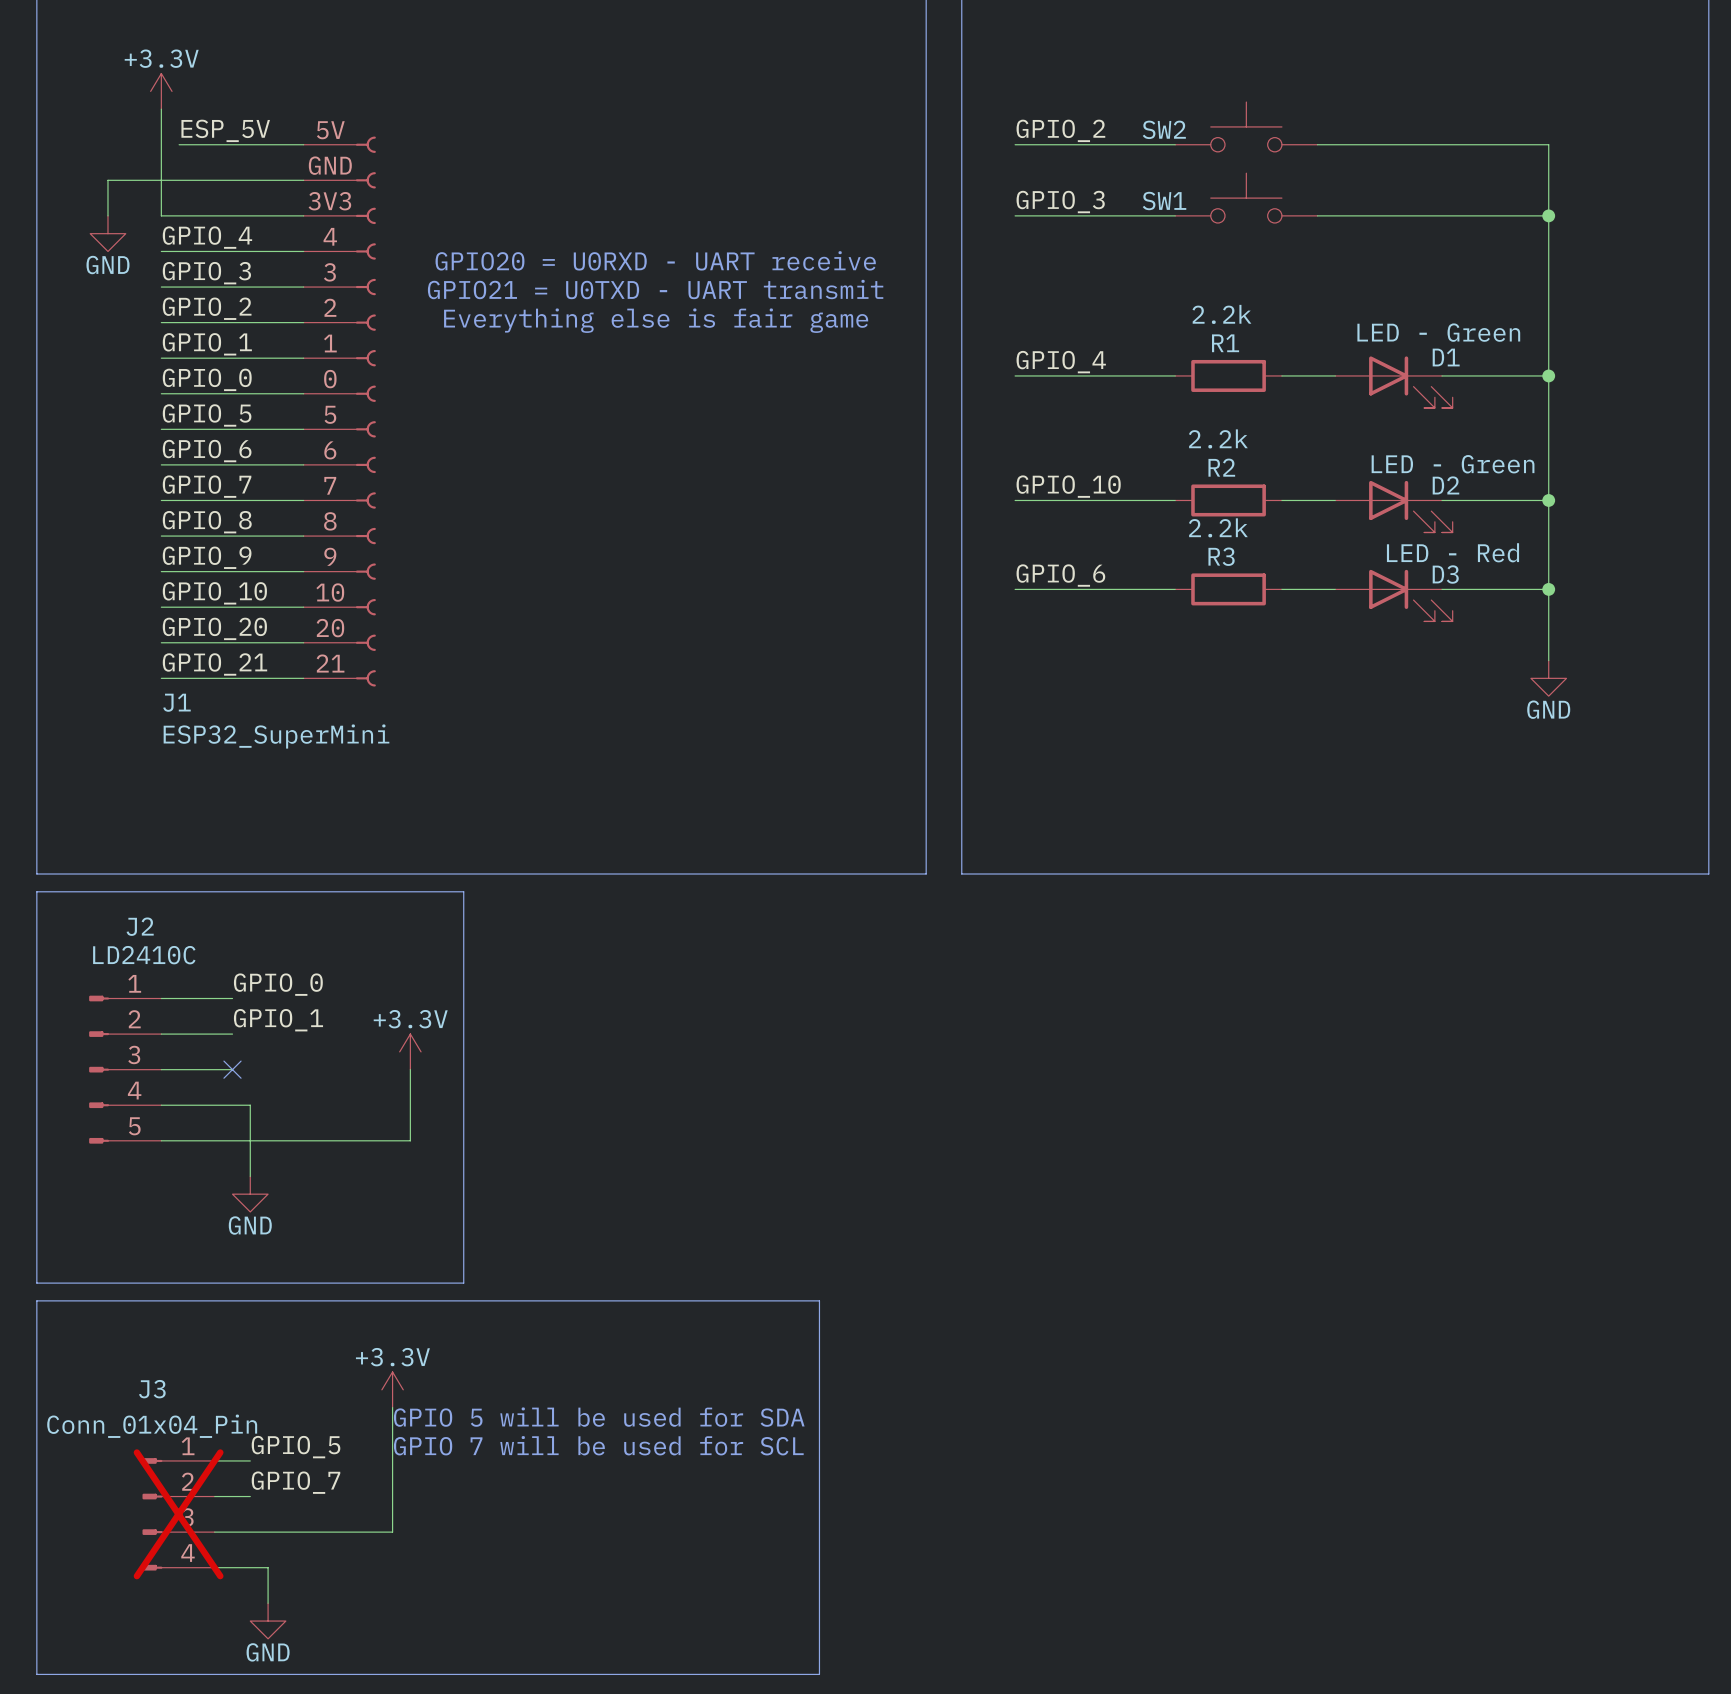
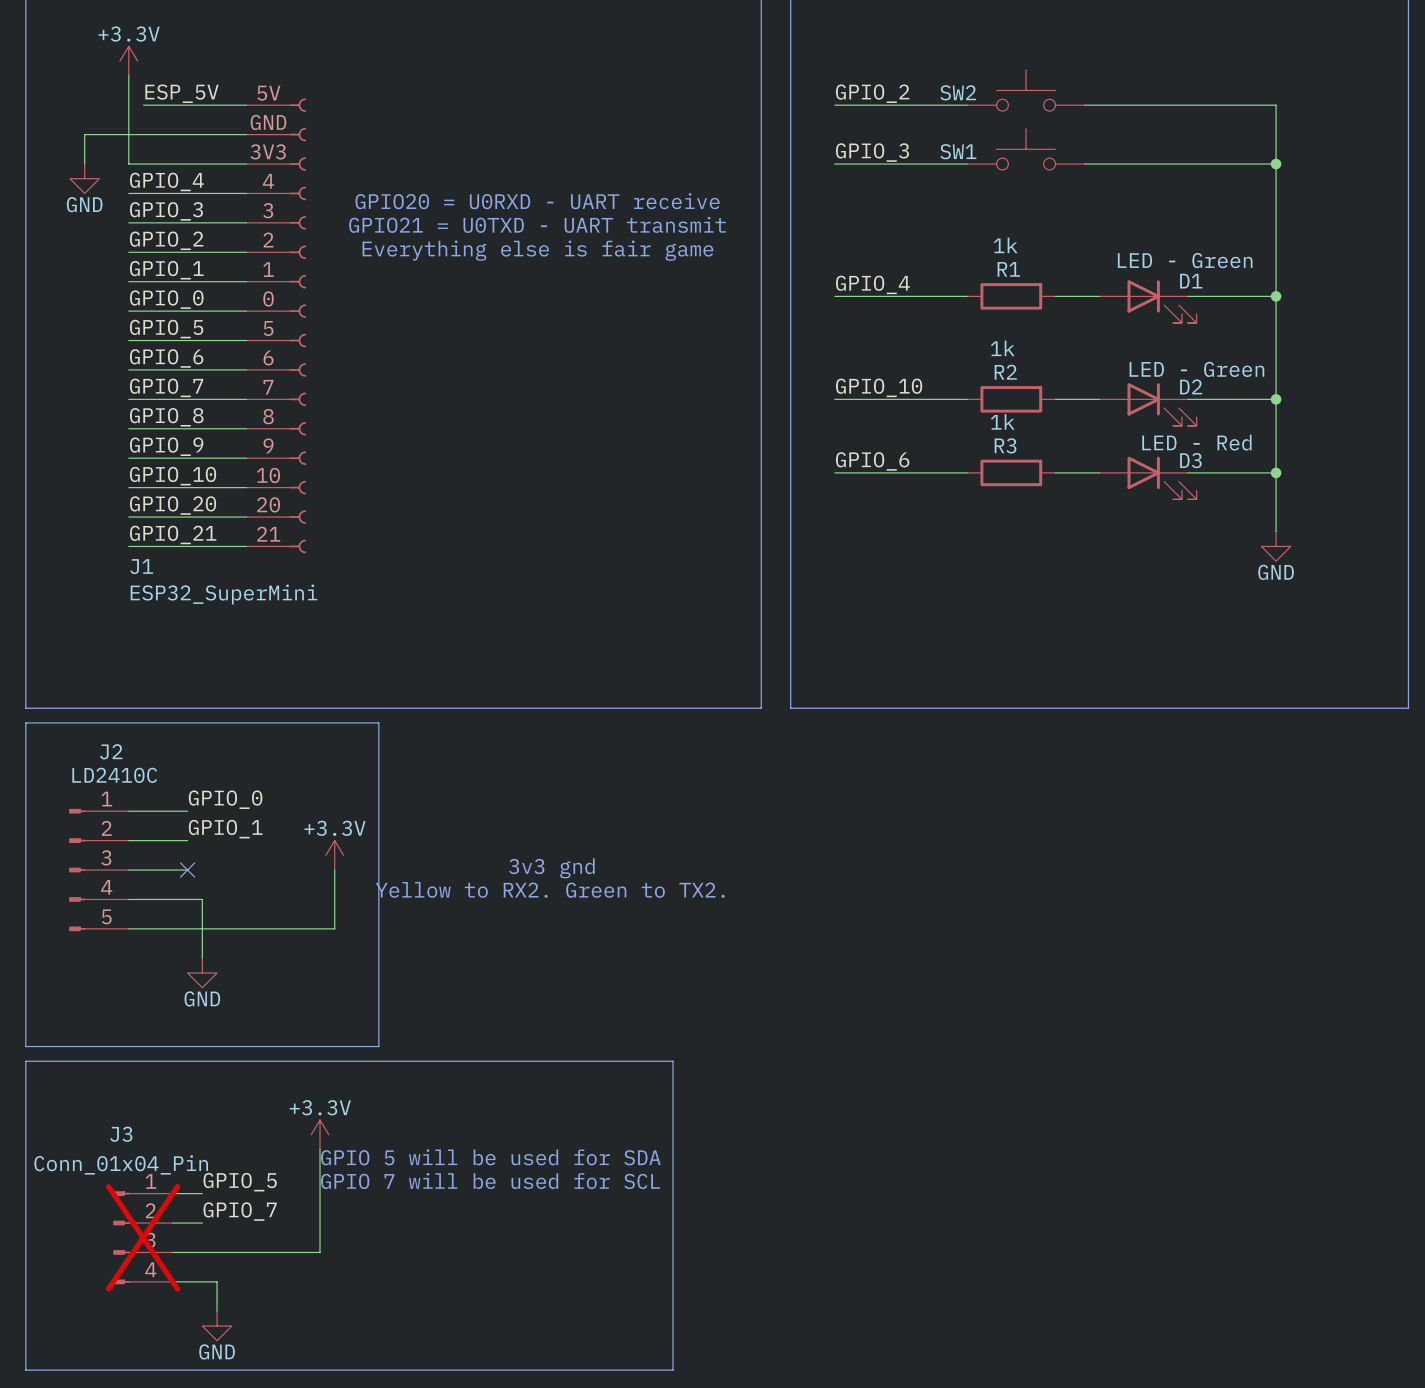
R1 value: 2.2k (1221, 314) -> 1k (1005, 245)
R2 value: 2.2k (1218, 438) -> 1k (1002, 348)
R3 value: 2.2k (1218, 527) -> 1k (1002, 421)
text: none -> 3v3 gnd (551, 868)
text: none -> Yellow to RX2. Green to TX2. (550, 889)

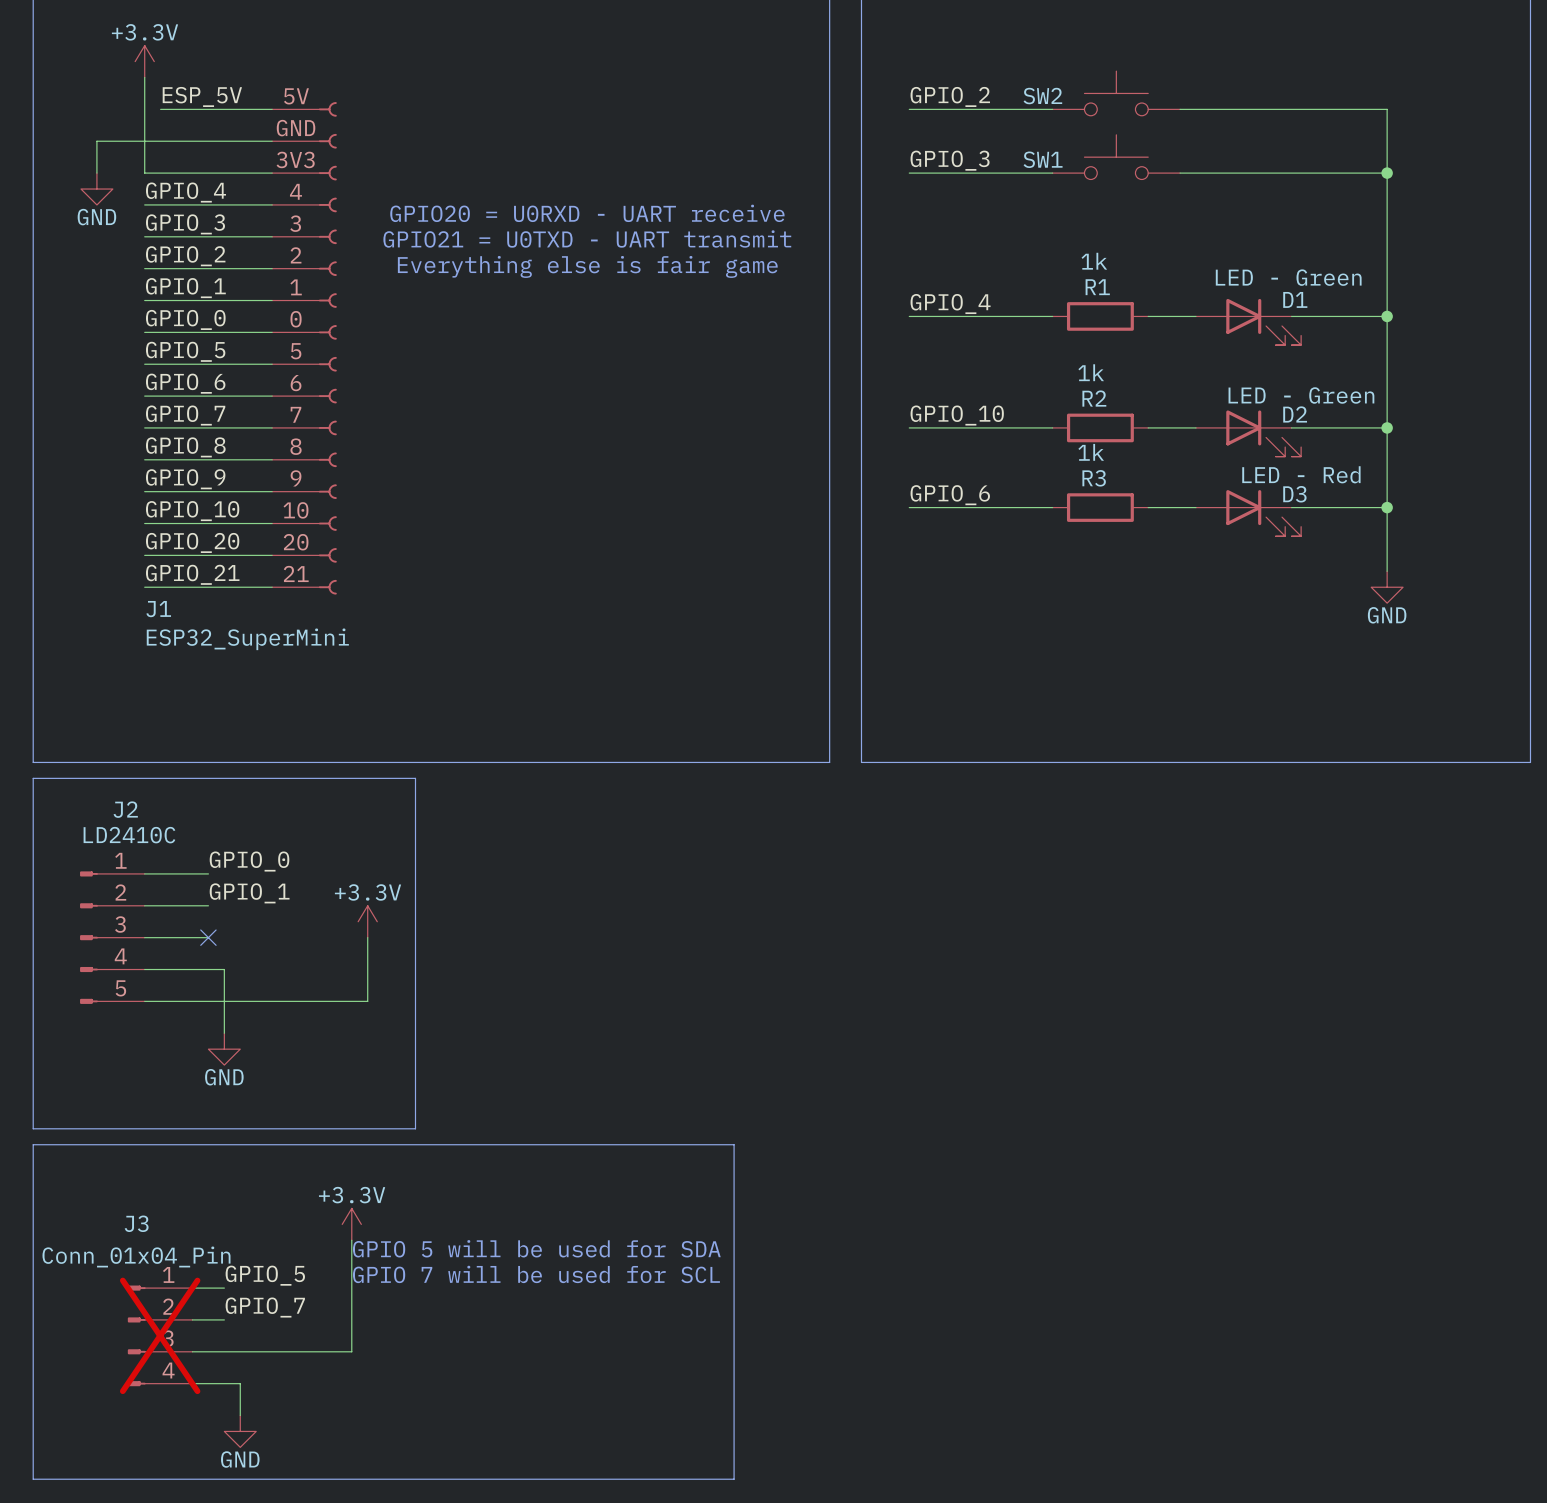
text: 3v3 gnd (551, 868) -> none
text: Yellow to RX2. Green to TX2. (550, 889) -> none

